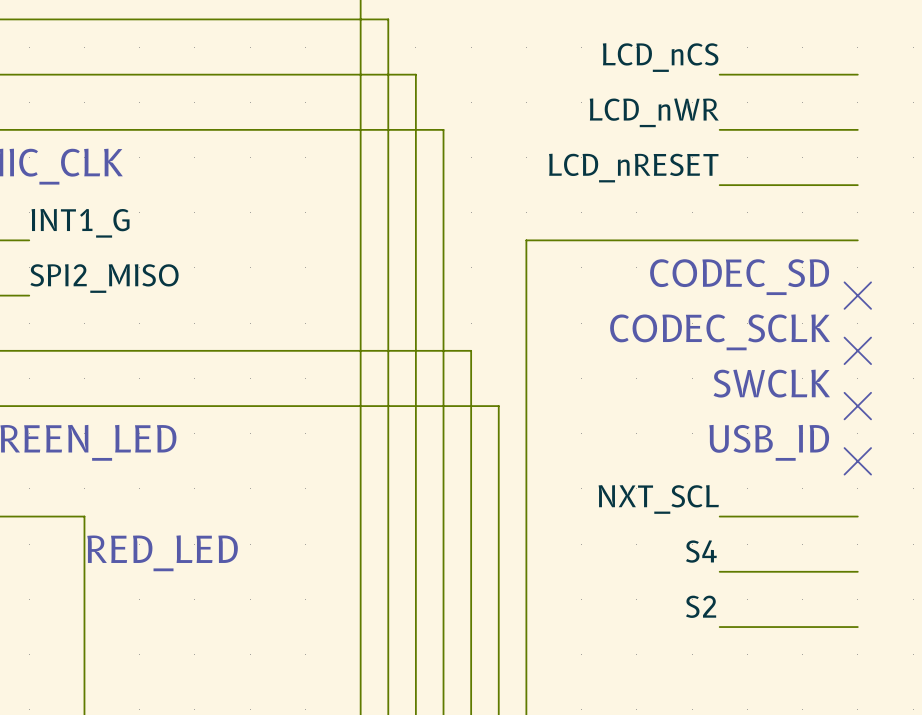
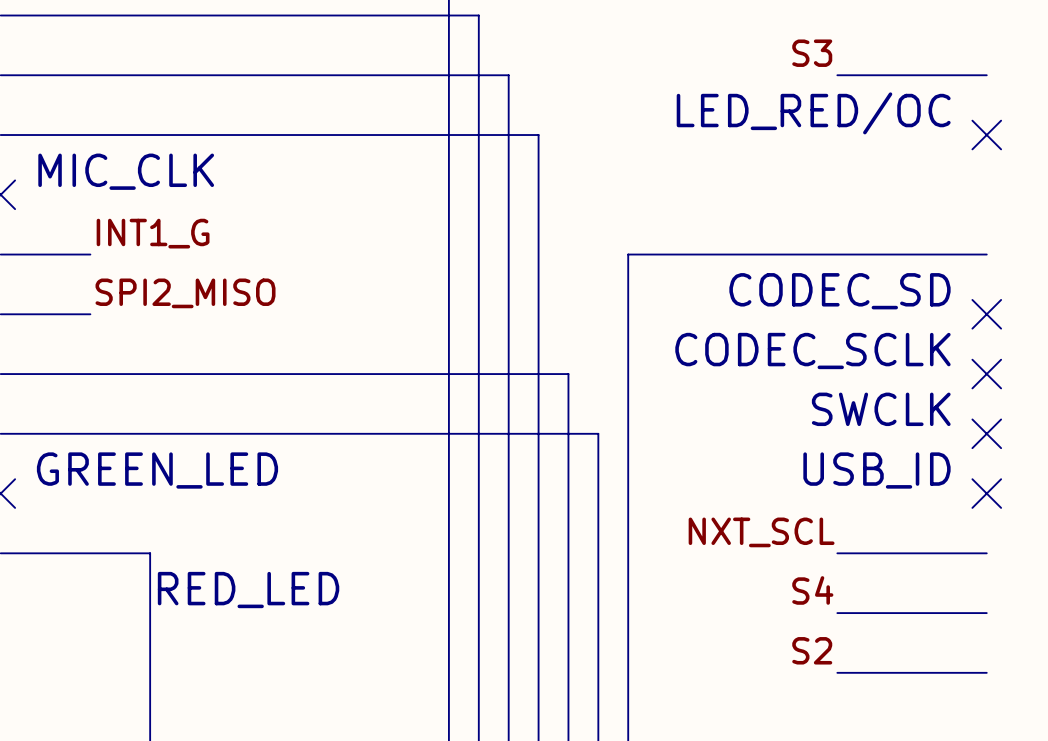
label: LCD_nCS (660, 57) -> S3 (812, 53)
text: none -> LED_RED/OC (813, 113)
label: LCD_nWR (654, 112) -> none
wire: (719, 129) (857, 129) -> none
no-connect mark: none -> (986, 135)
label: LCD_nRESET (633, 168) -> none
wire: (719, 185) (857, 185) -> none

